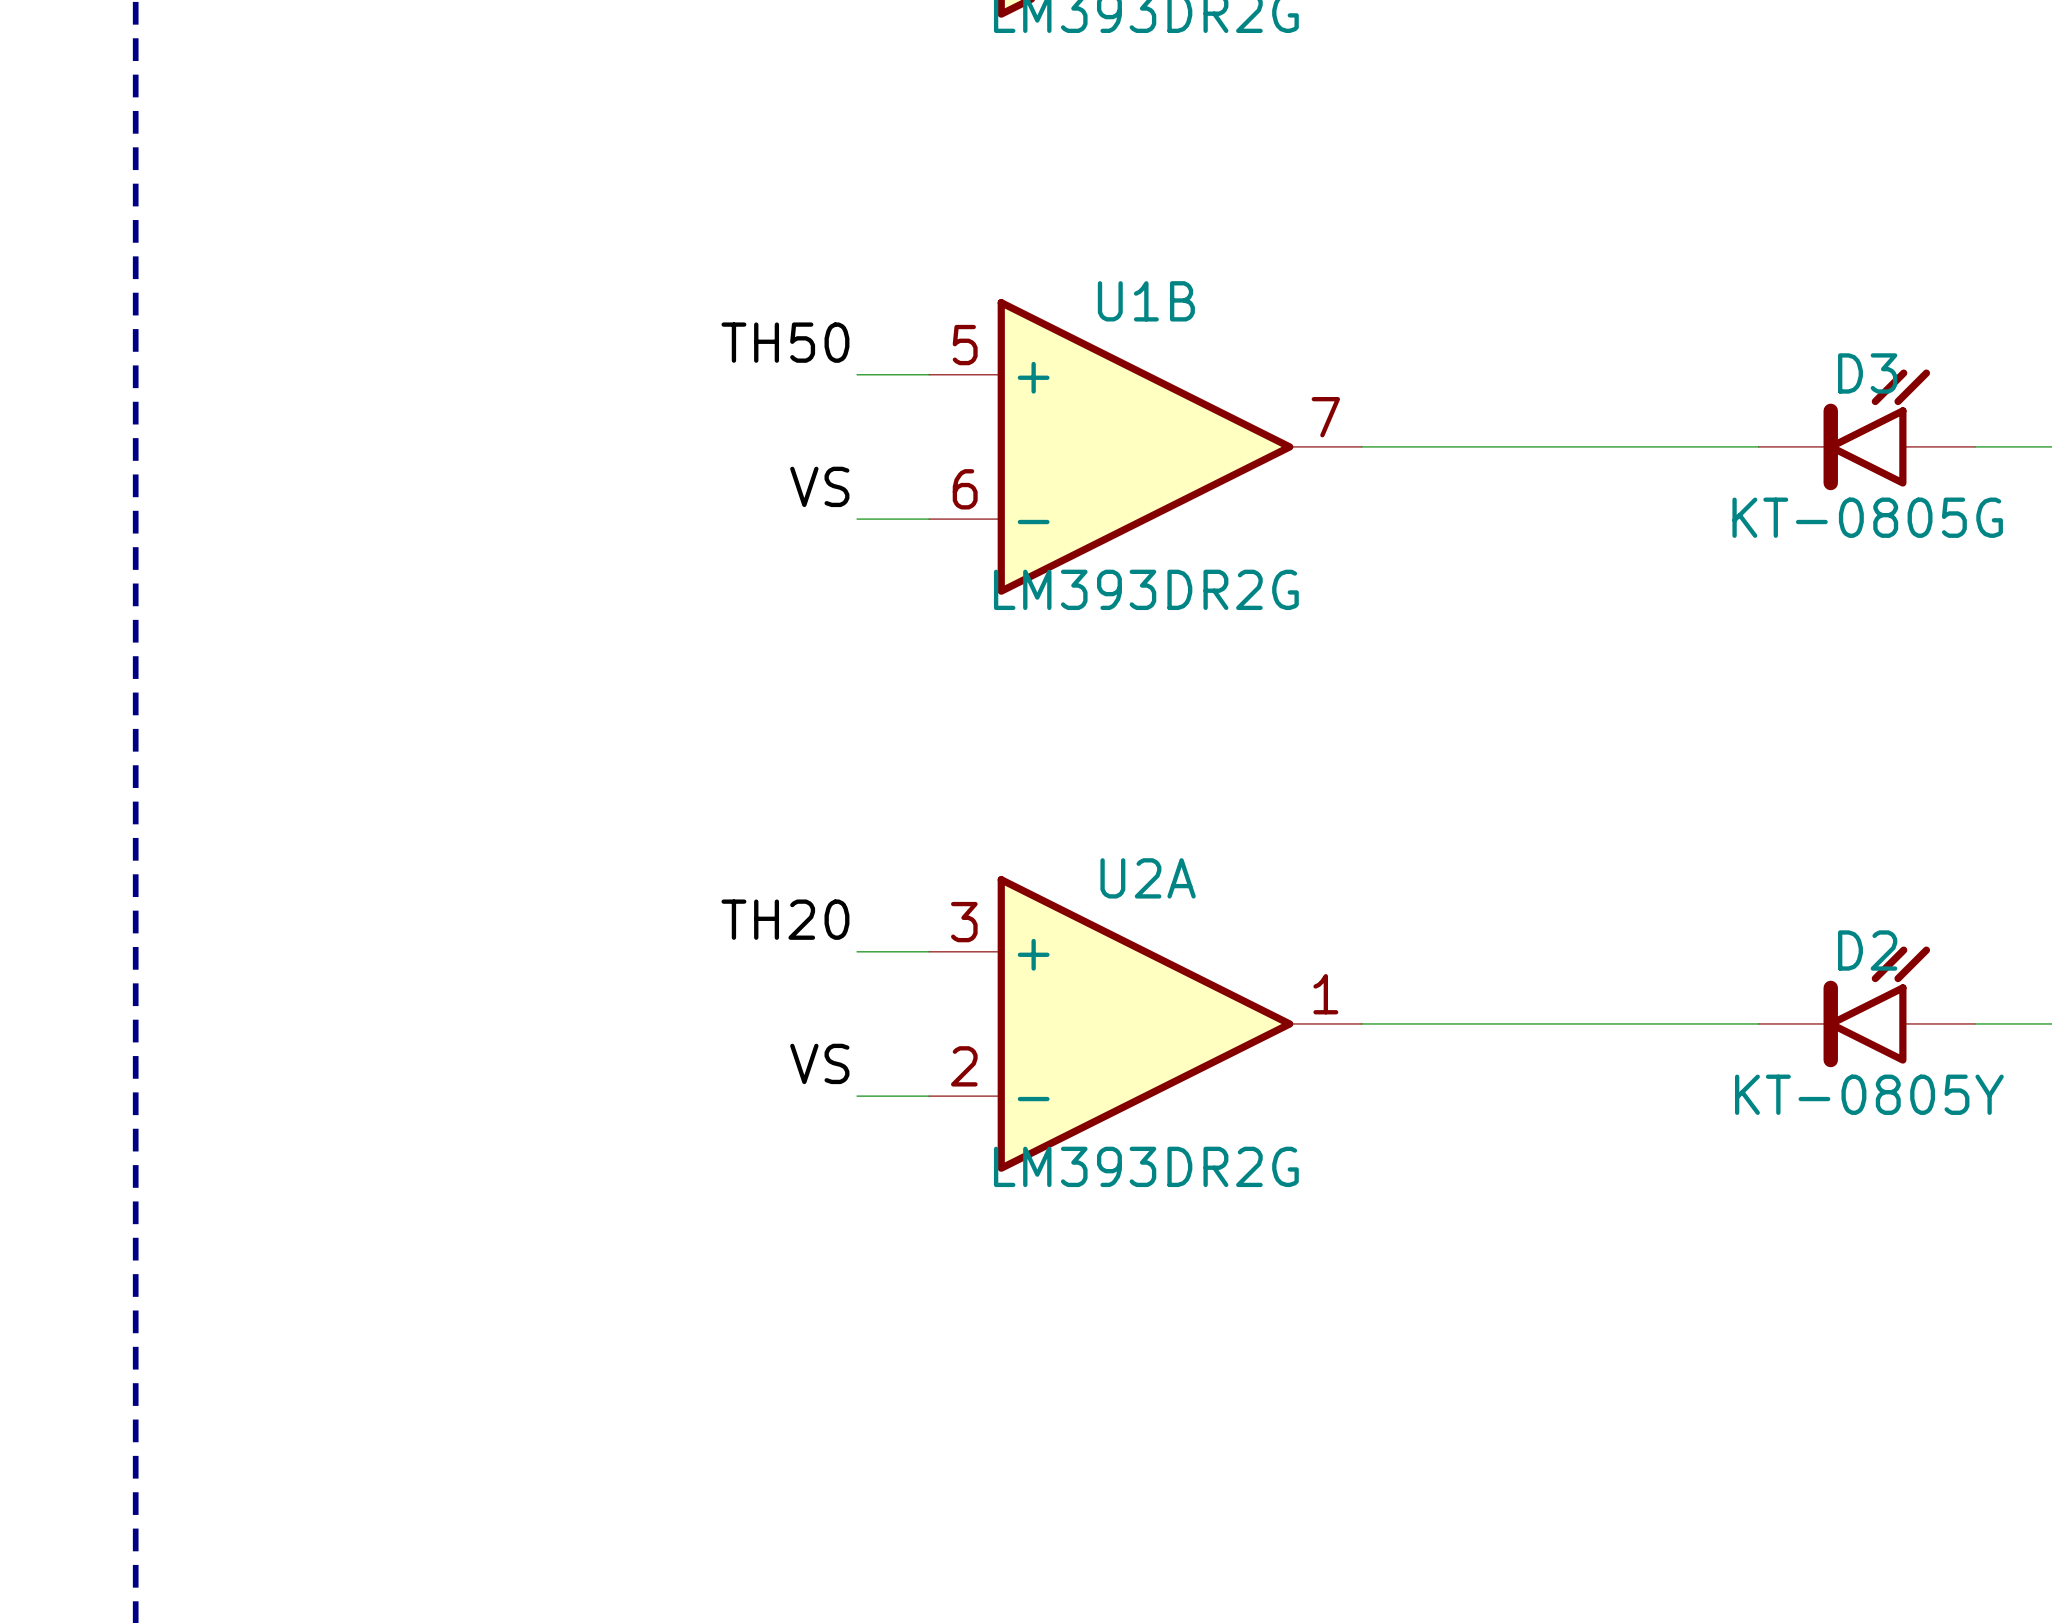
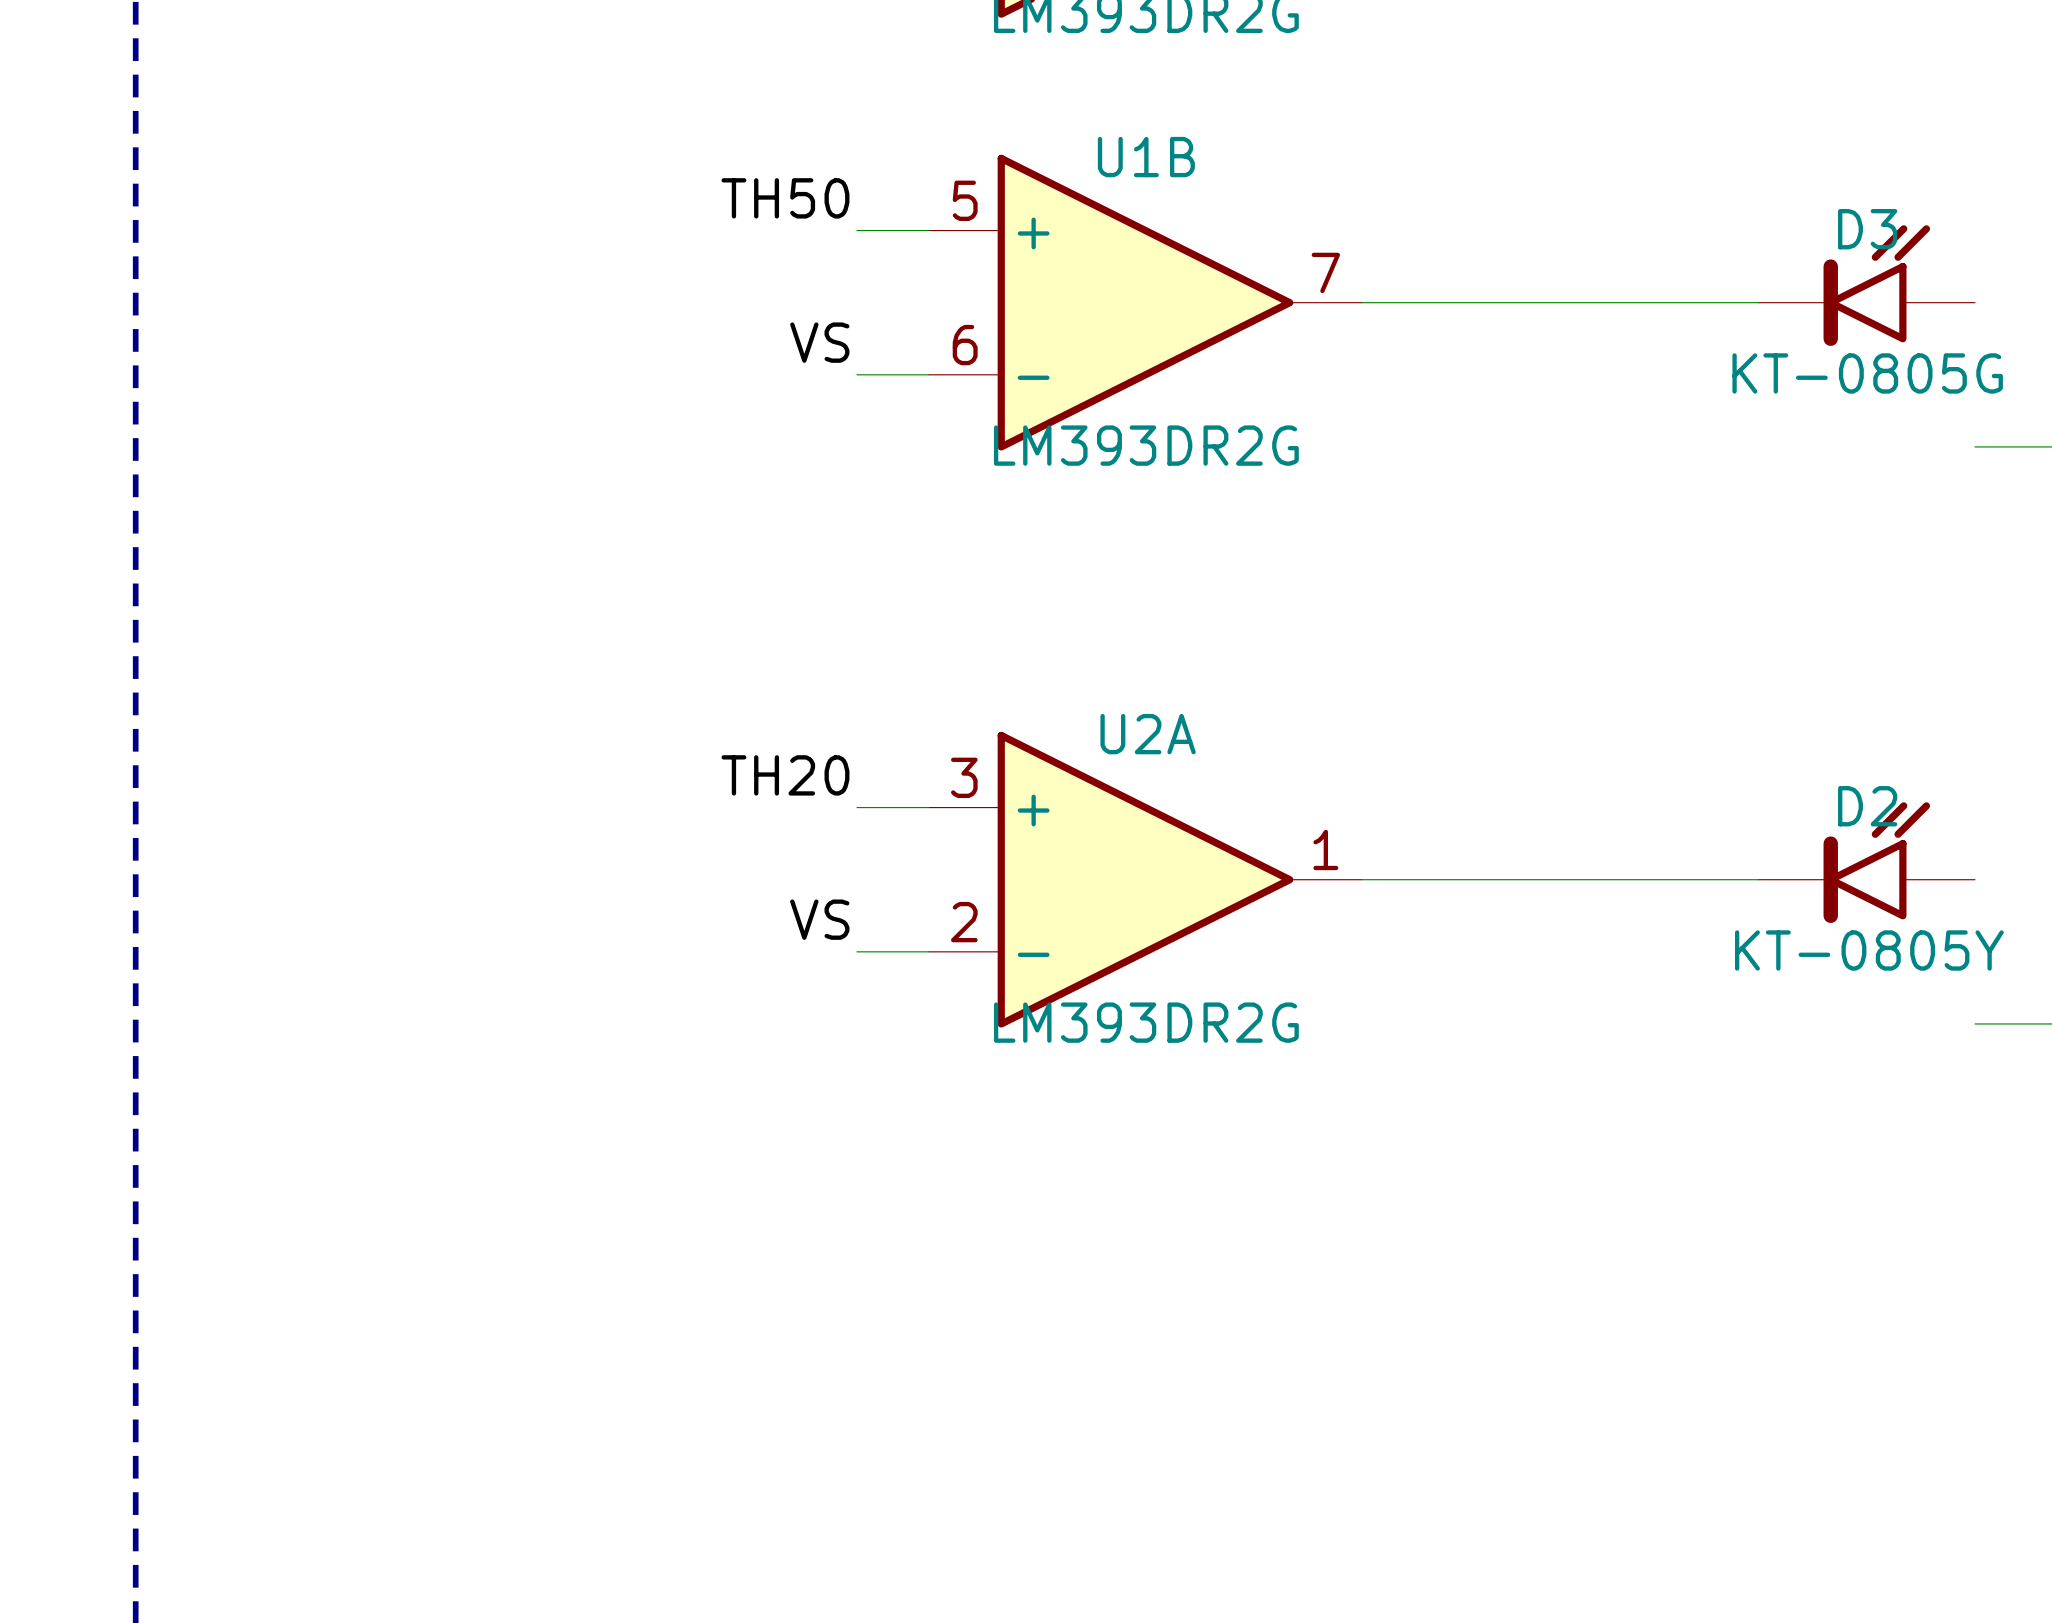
label: none -> TH50 (785, 198)
label: TH50 (785, 342) -> VS (819, 342)
D3 position: (1866, 429) -> (1866, 285)
U1B position: (1145, 446) -> (1145, 302)
wire: (1361, 446) (1758, 446) -> (1361, 302) (1758, 302)
label: VS (819, 486) -> none
wire: (856, 519) (929, 519) -> (856, 230) (929, 230)
label: none -> TH20 (785, 775)
label: TH20 (785, 919) -> VS (819, 919)
D2 position: (1866, 1006) -> (1866, 862)
U2A position: (1145, 1023) -> (1145, 879)
wire: (1361, 1023) (1758, 1023) -> (1361, 879) (1758, 879)
label: VS (819, 1063) -> none
wire: (856, 1096) (929, 1096) -> (856, 807) (929, 807)

